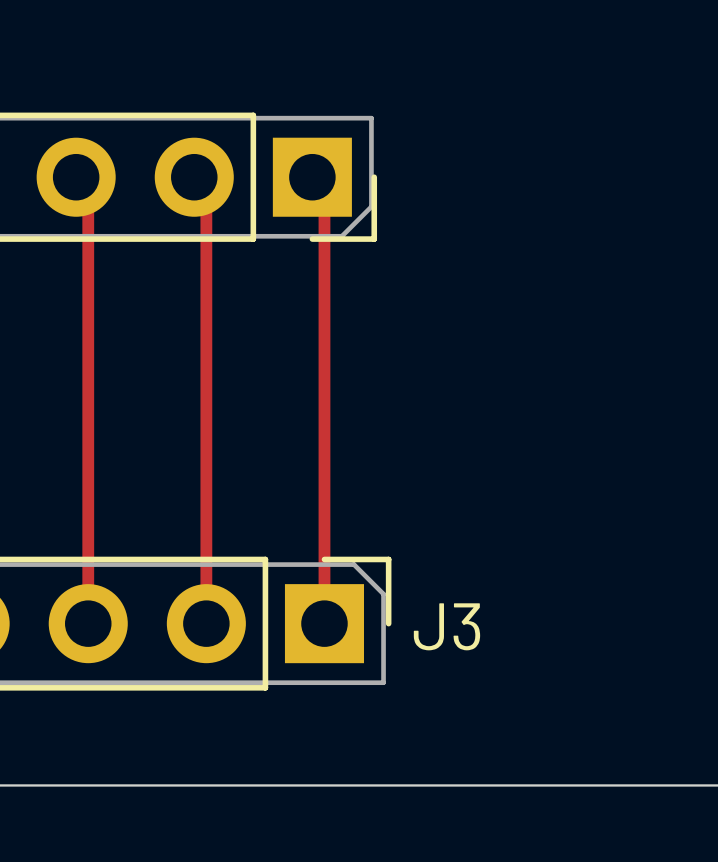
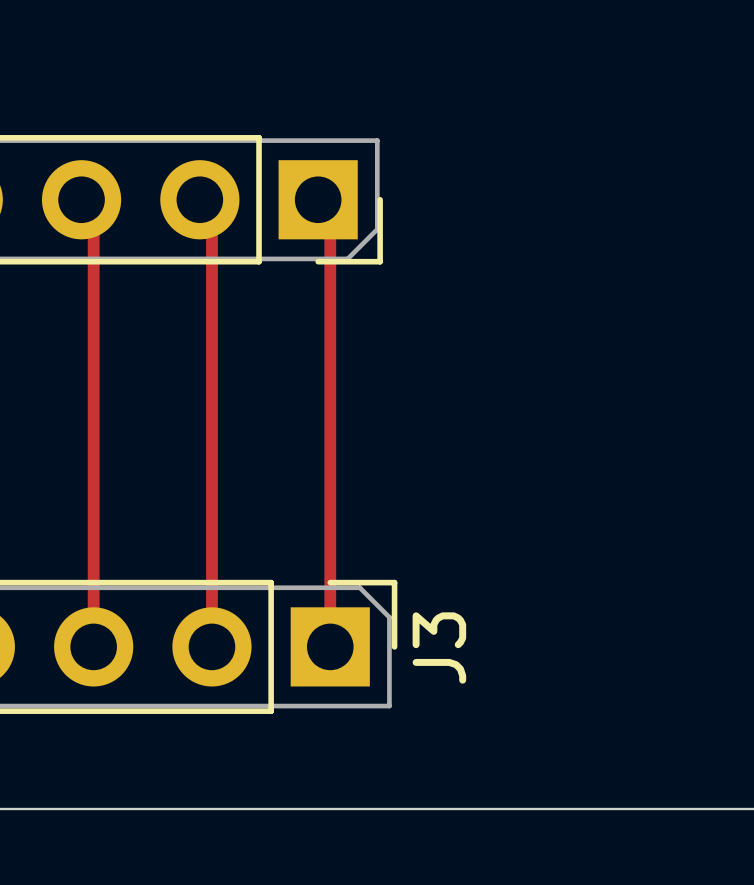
J3 name rotation: 0° (446, 626) -> 90° counterclockwise (439, 648)

